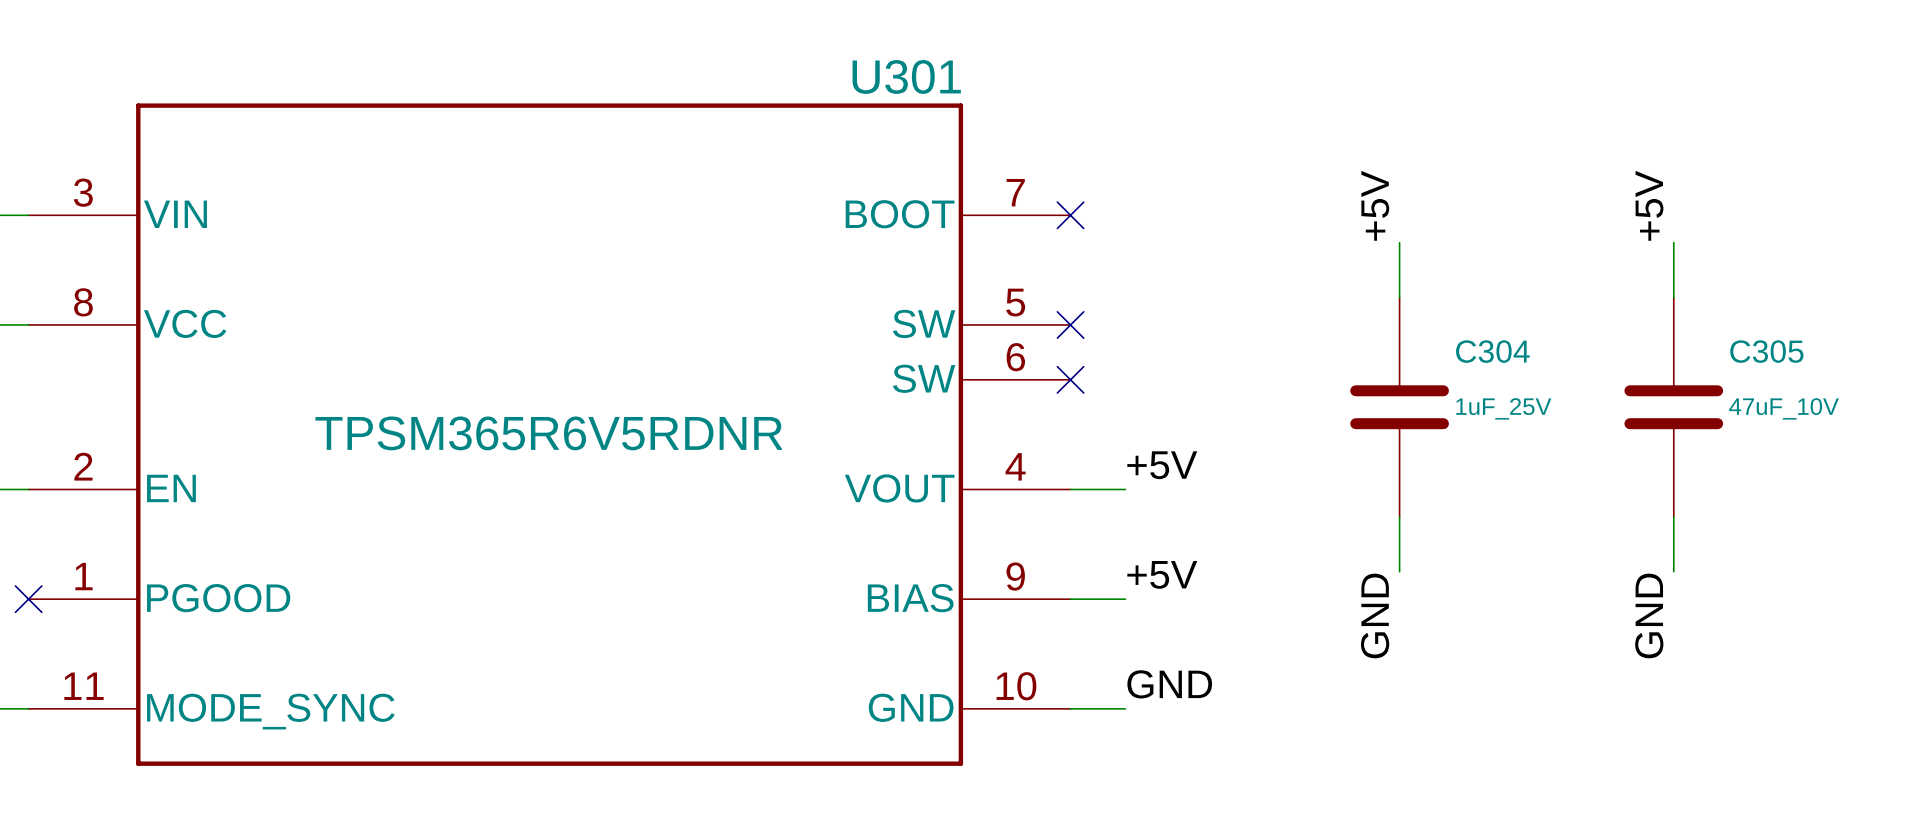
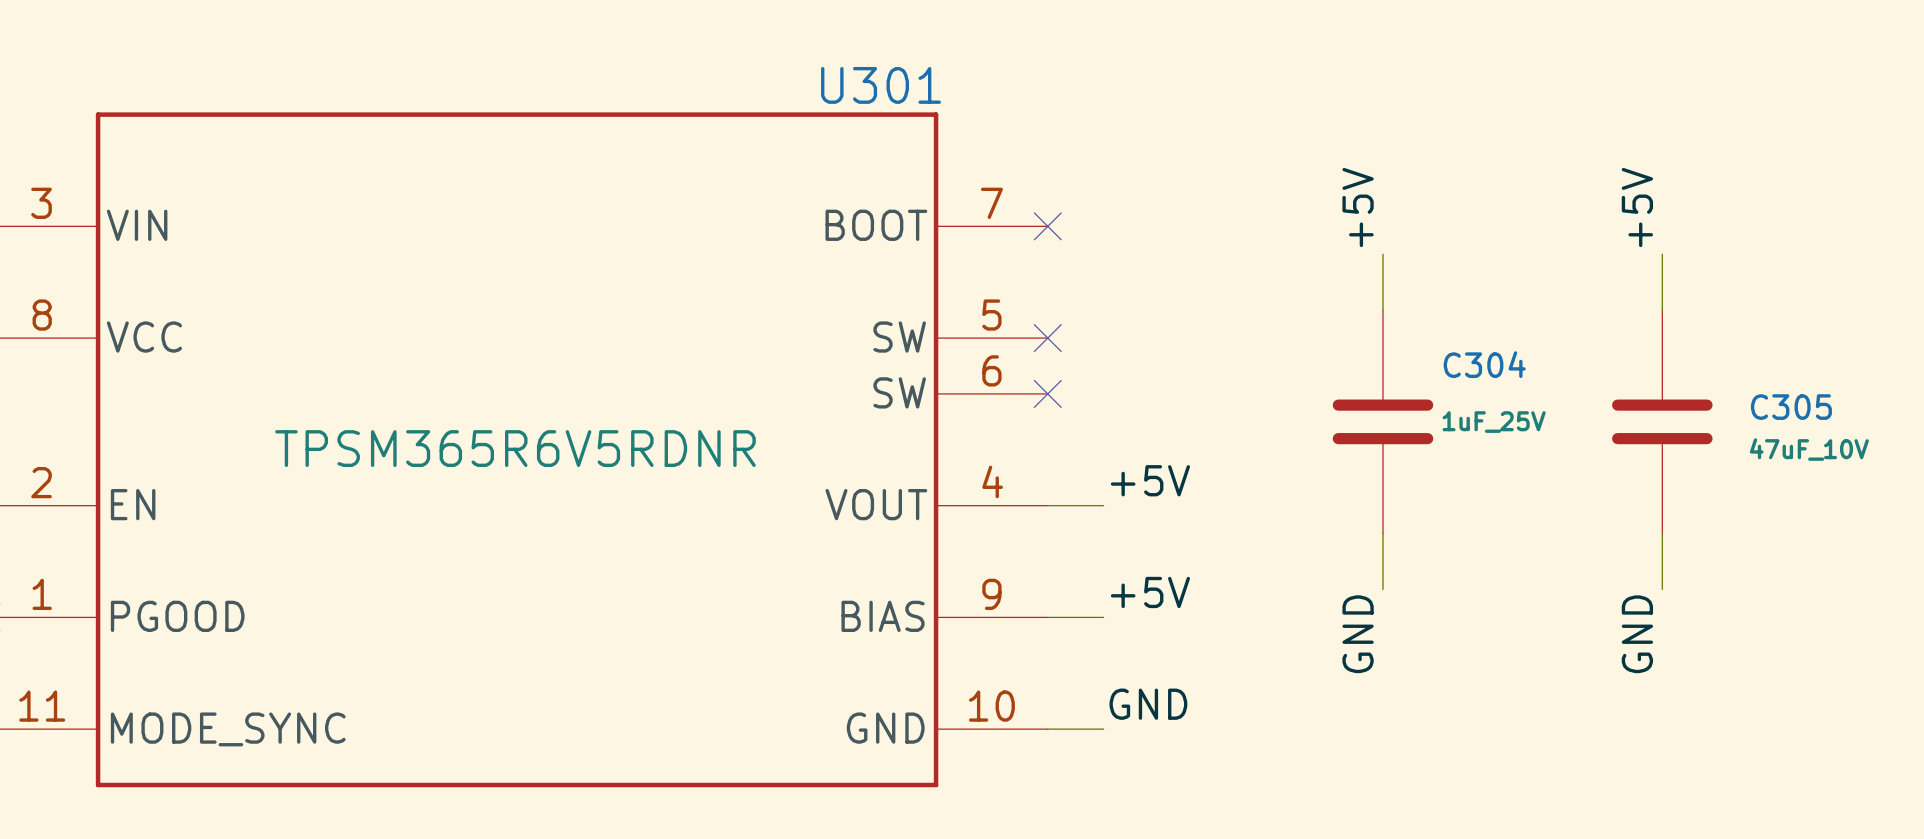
C305 name position: C305 (1766, 351) -> C305 (1791, 407)
C305 value position: 47uF_10V (1784, 408) -> 47uF_10V (1809, 449)

